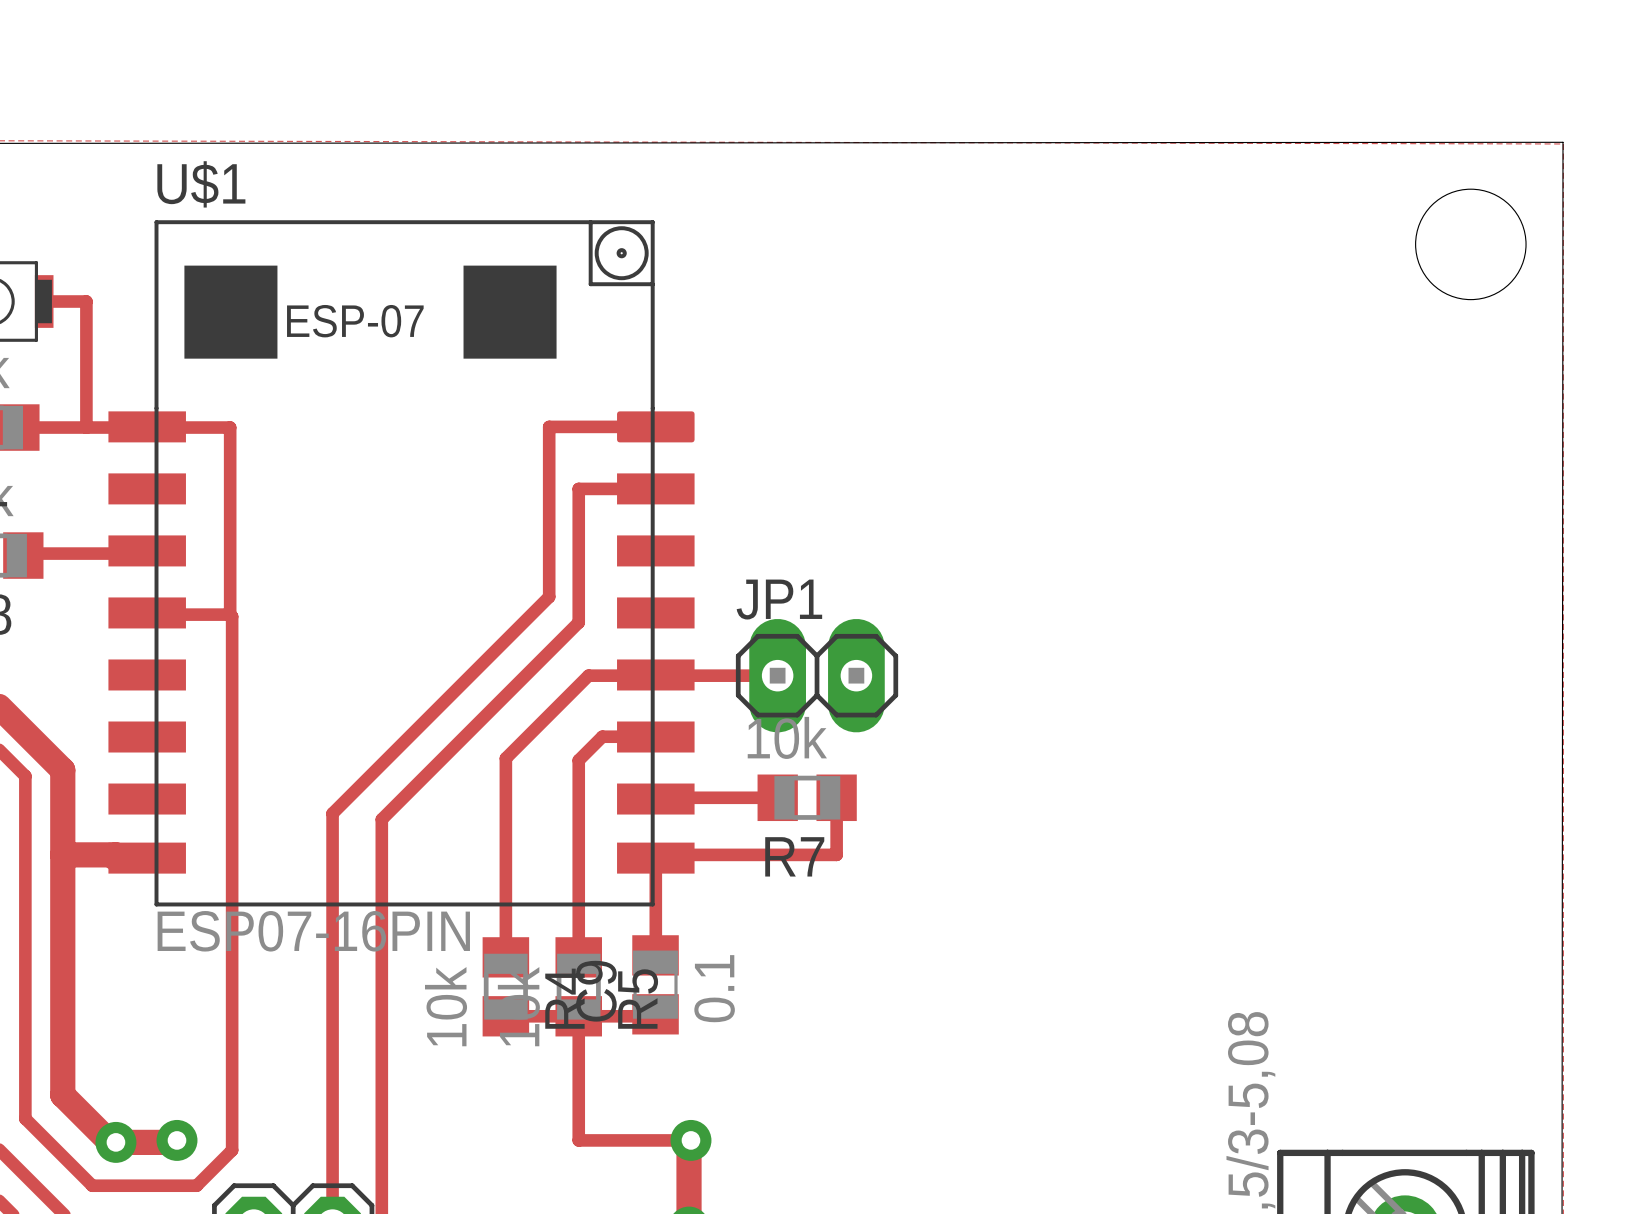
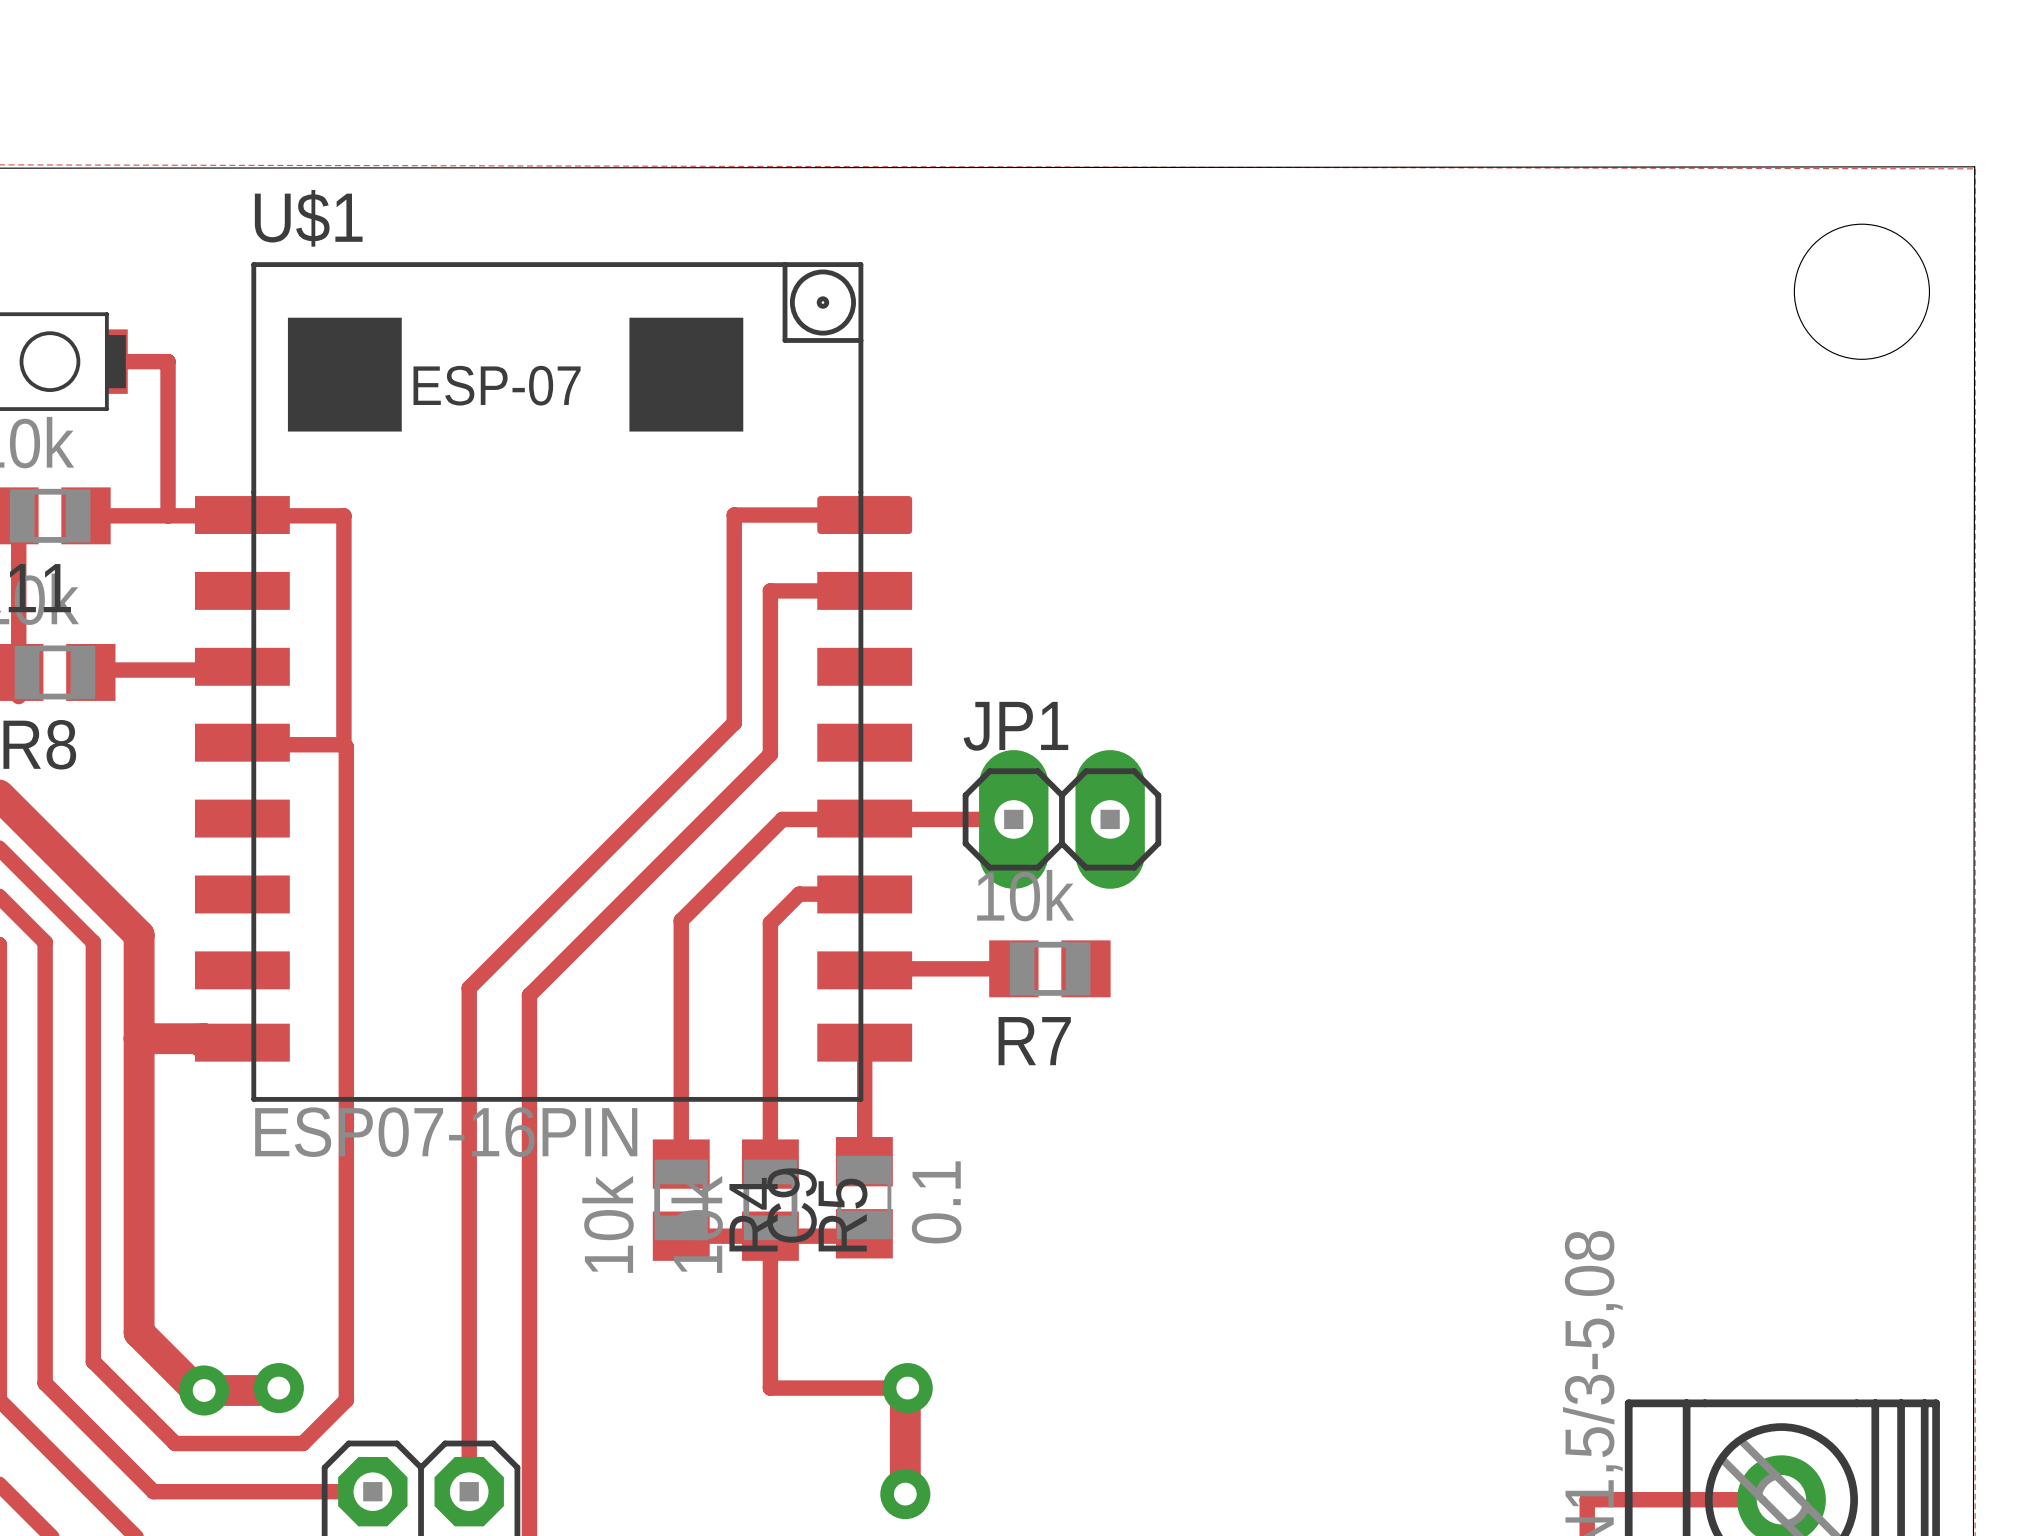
track: (836, 797) (836, 854) (655, 854) -> none

